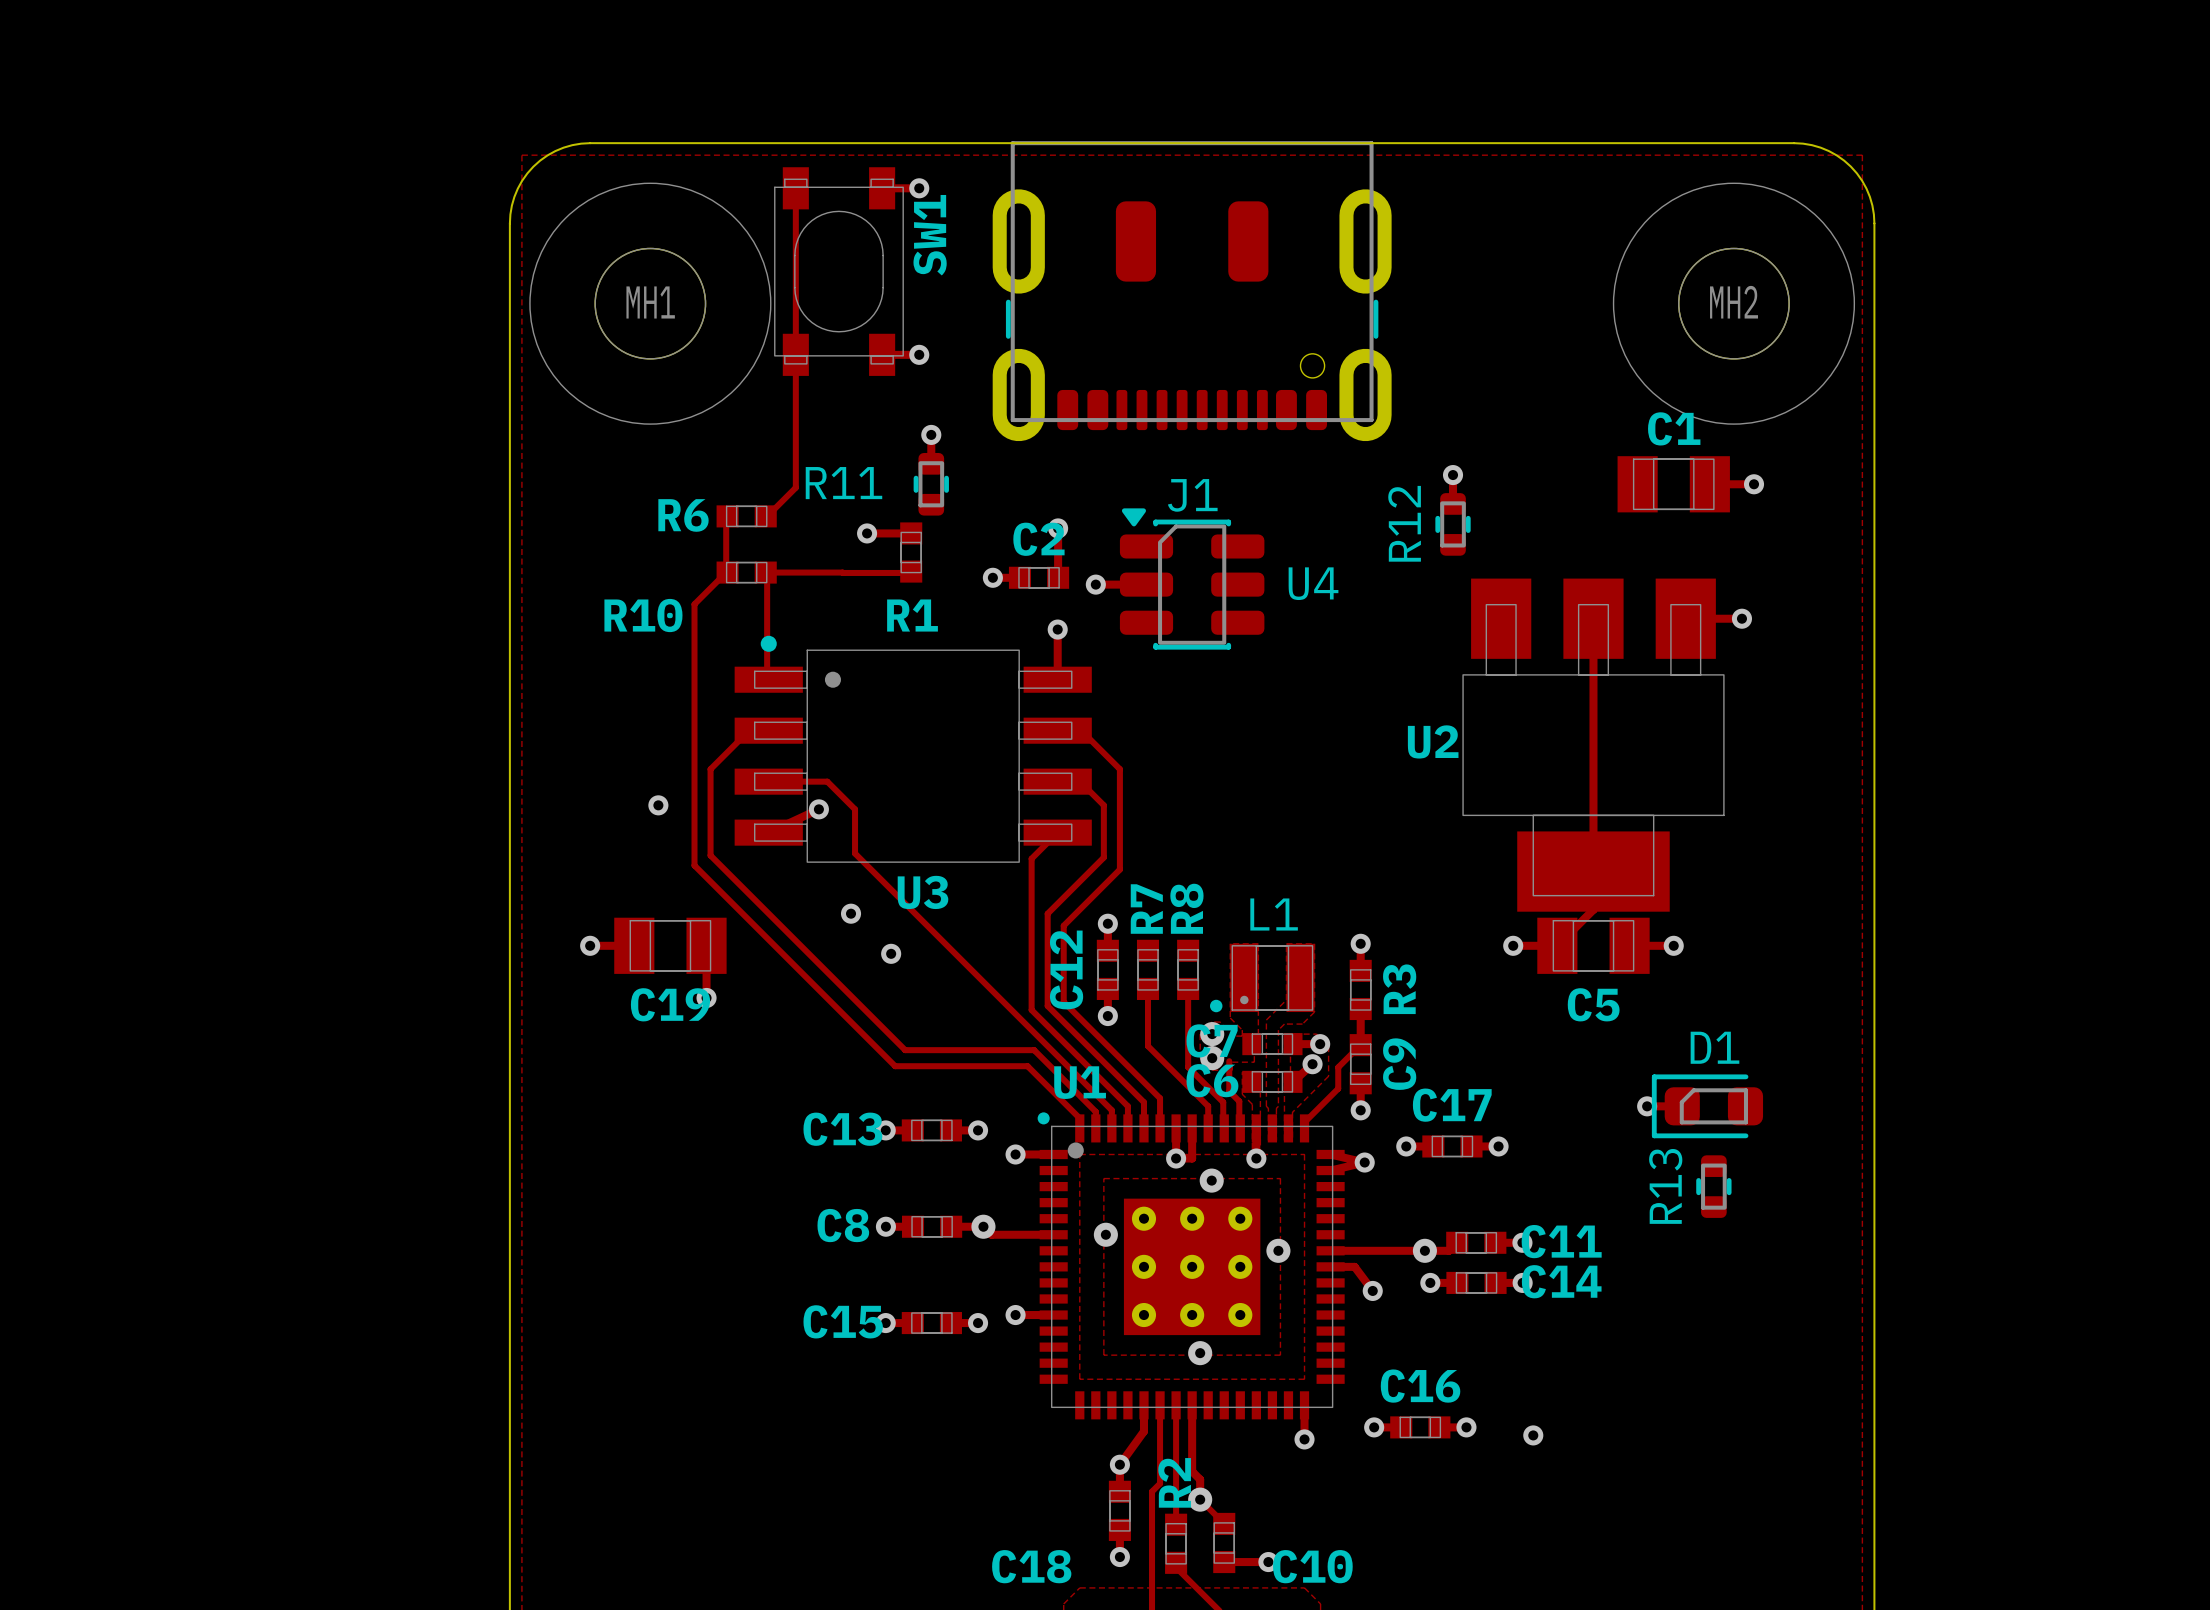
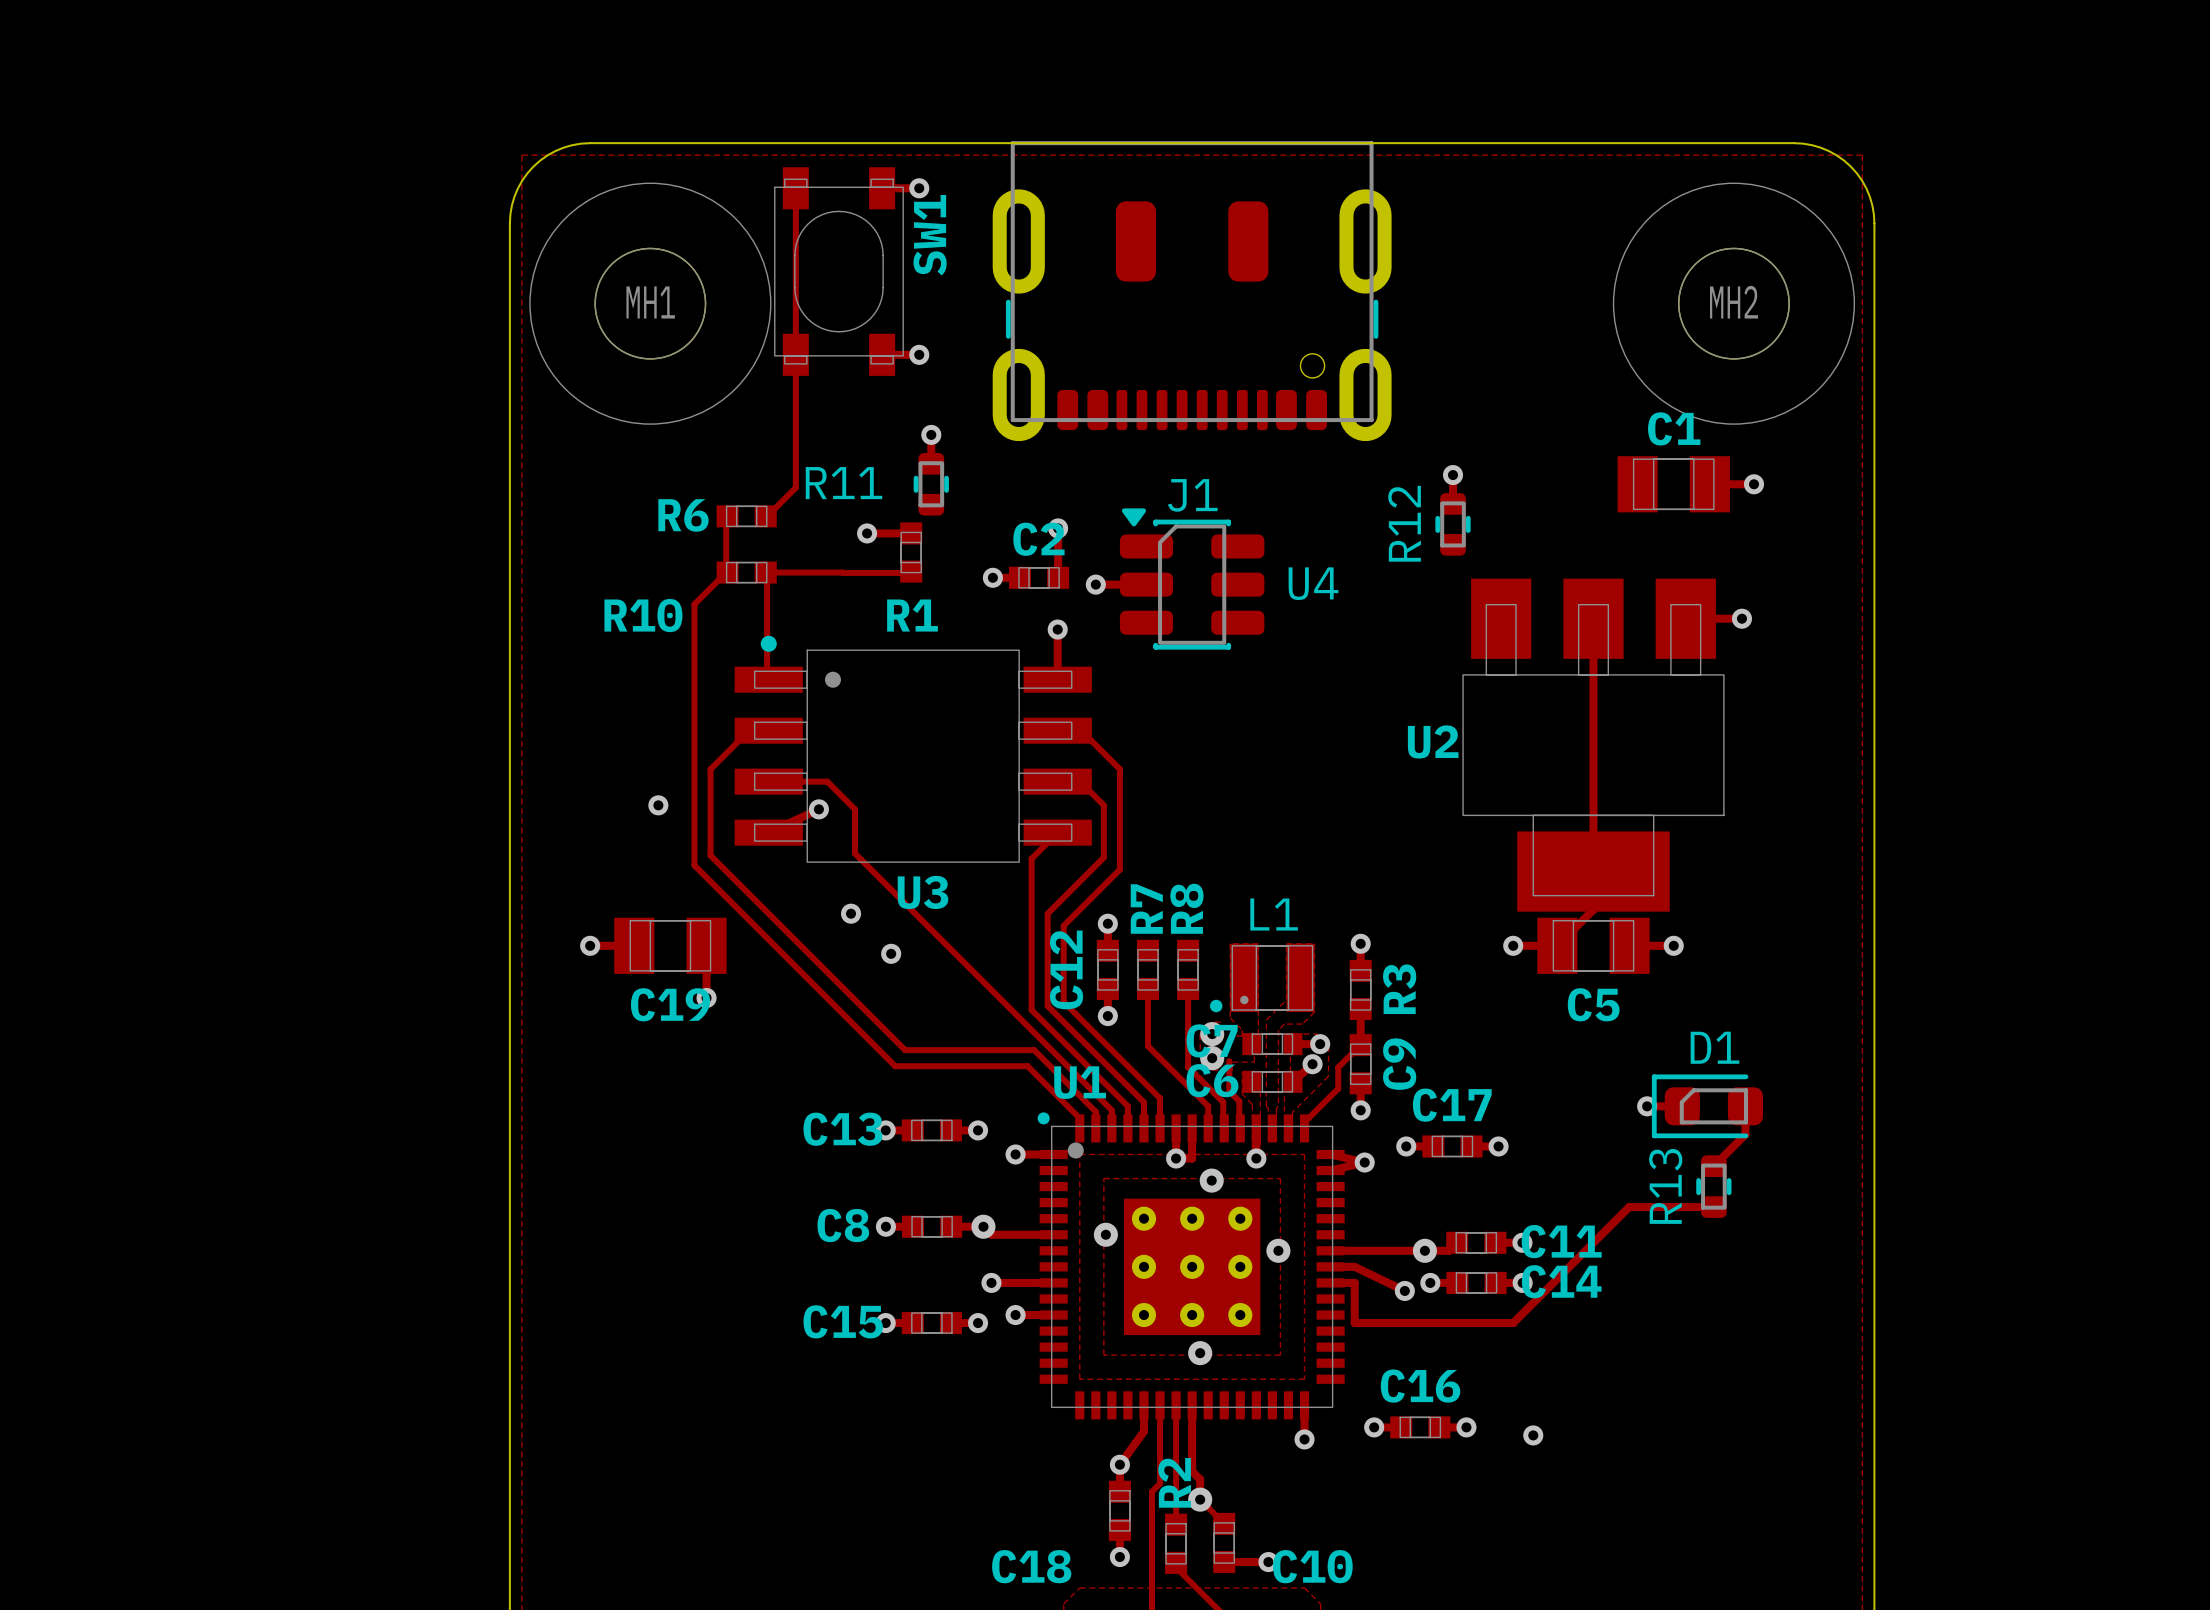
track: none -> (1745, 1106) (1745, 1134) (1713, 1166)
track: none -> (1713, 1207) (1629, 1207) (1513, 1323) (1354, 1323) (1354, 1282) (1330, 1282)
track: (1354, 1266) (1372, 1290) -> (1354, 1266) (1404, 1290)
track: none -> (991, 1282) (1053, 1282)
via: none -> (991, 1282)
via position: (1372, 1290) -> (1404, 1290)

